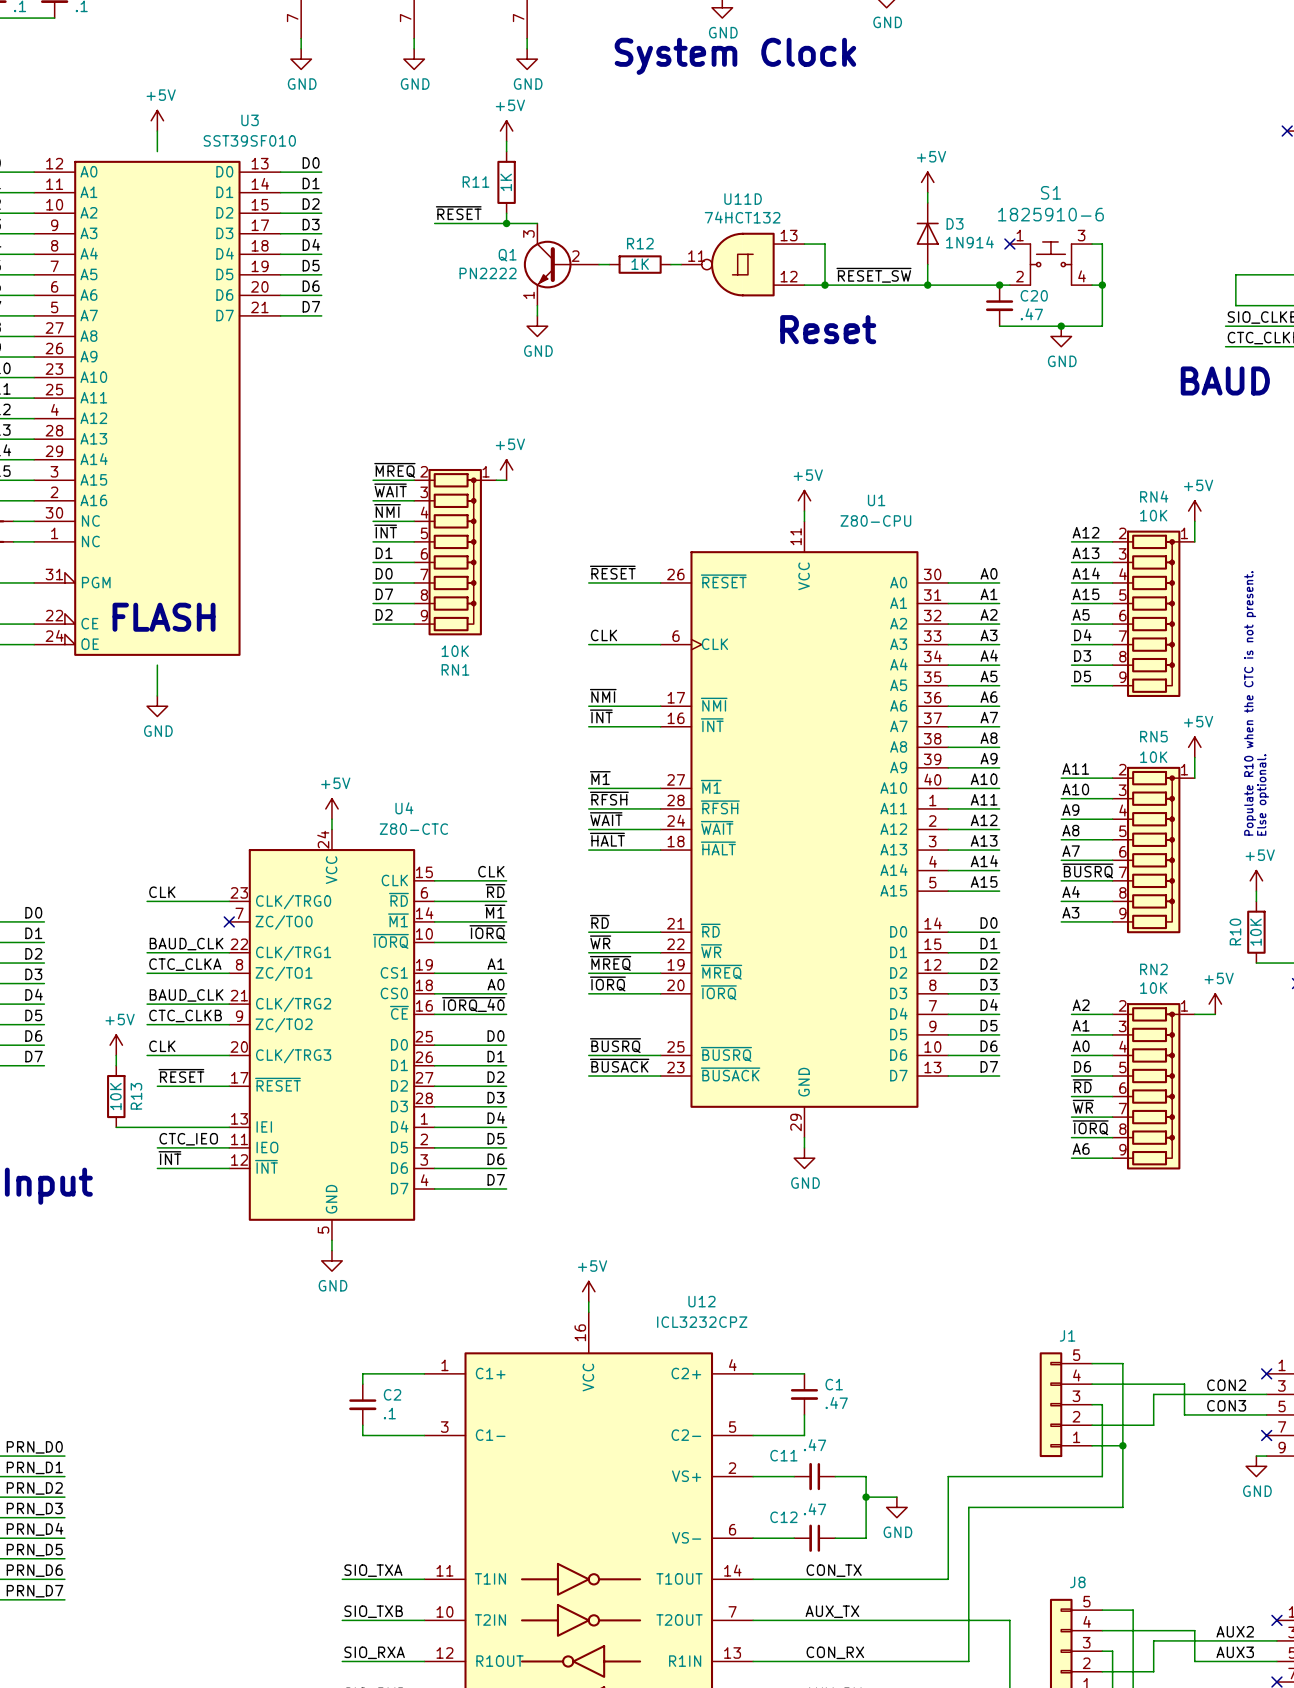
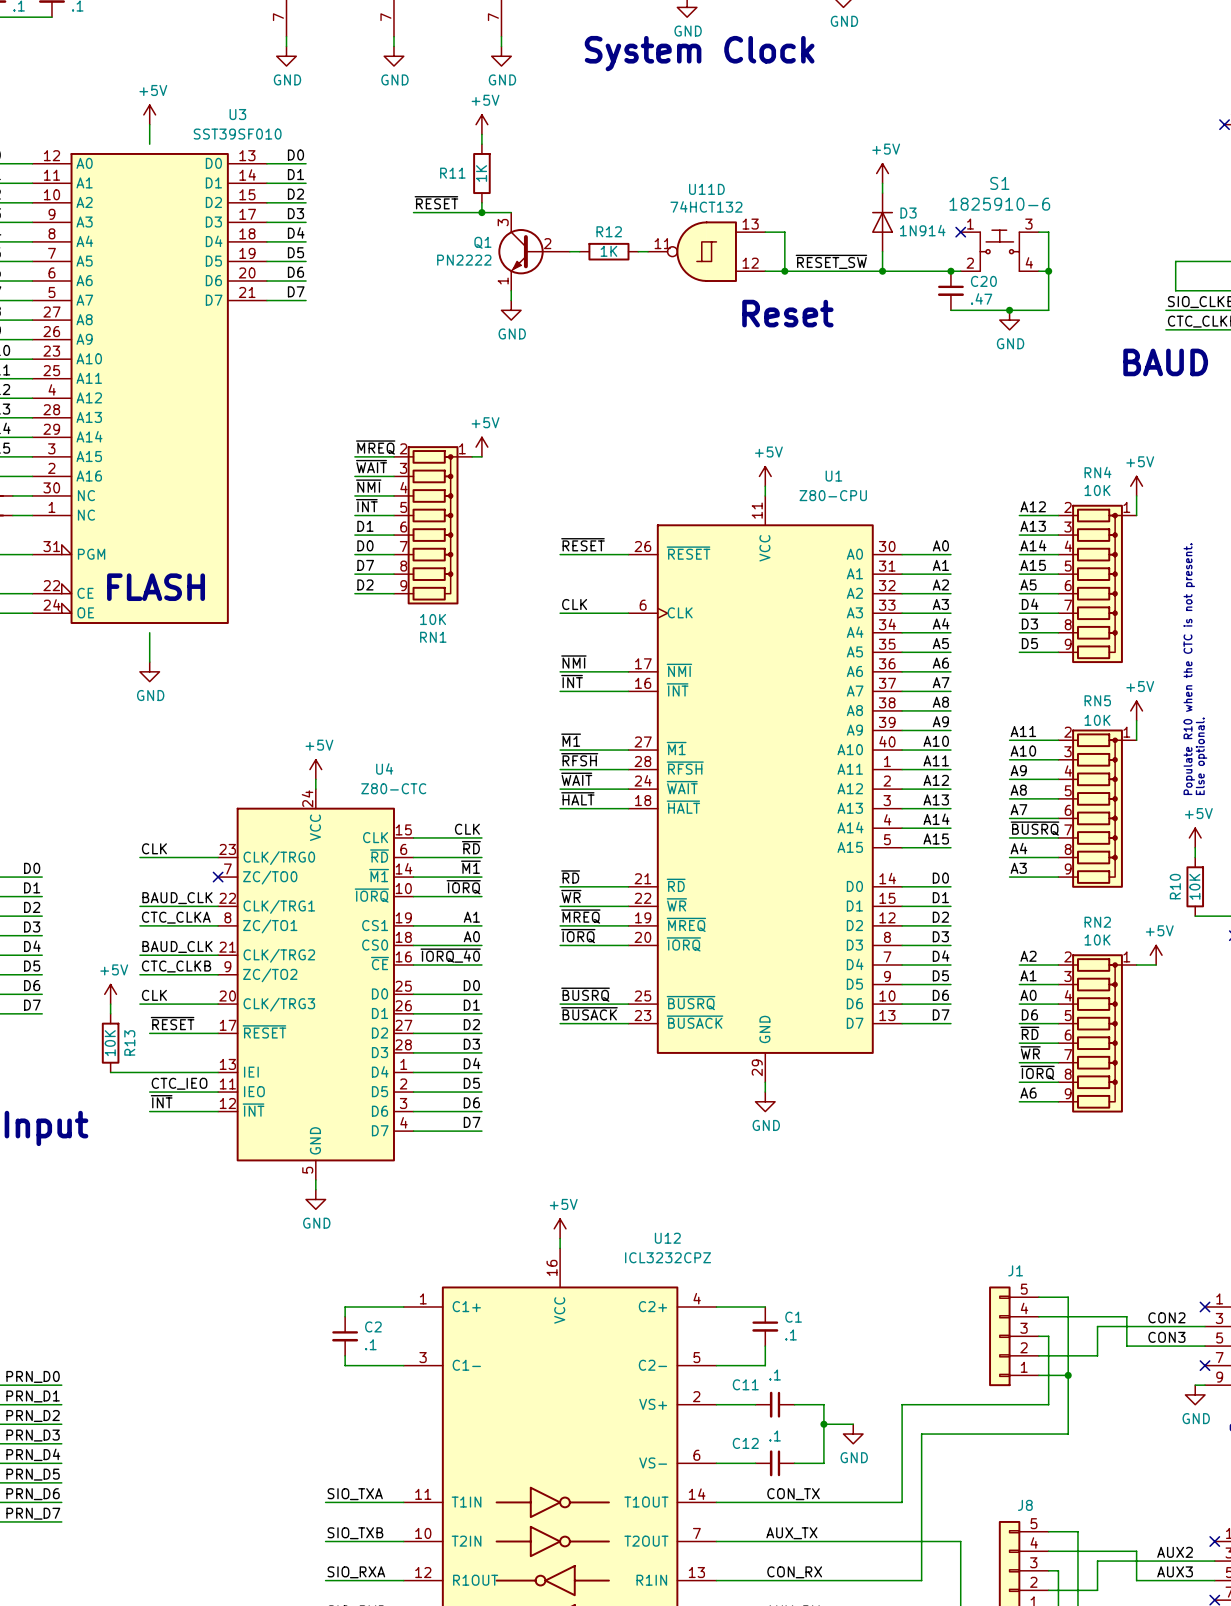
C1 value: .47 (836, 1403) -> .1 (791, 1334)
C11 value: .47 (814, 1445) -> .1 (775, 1375)
C12 value: .47 (814, 1509) -> .1 (775, 1436)

